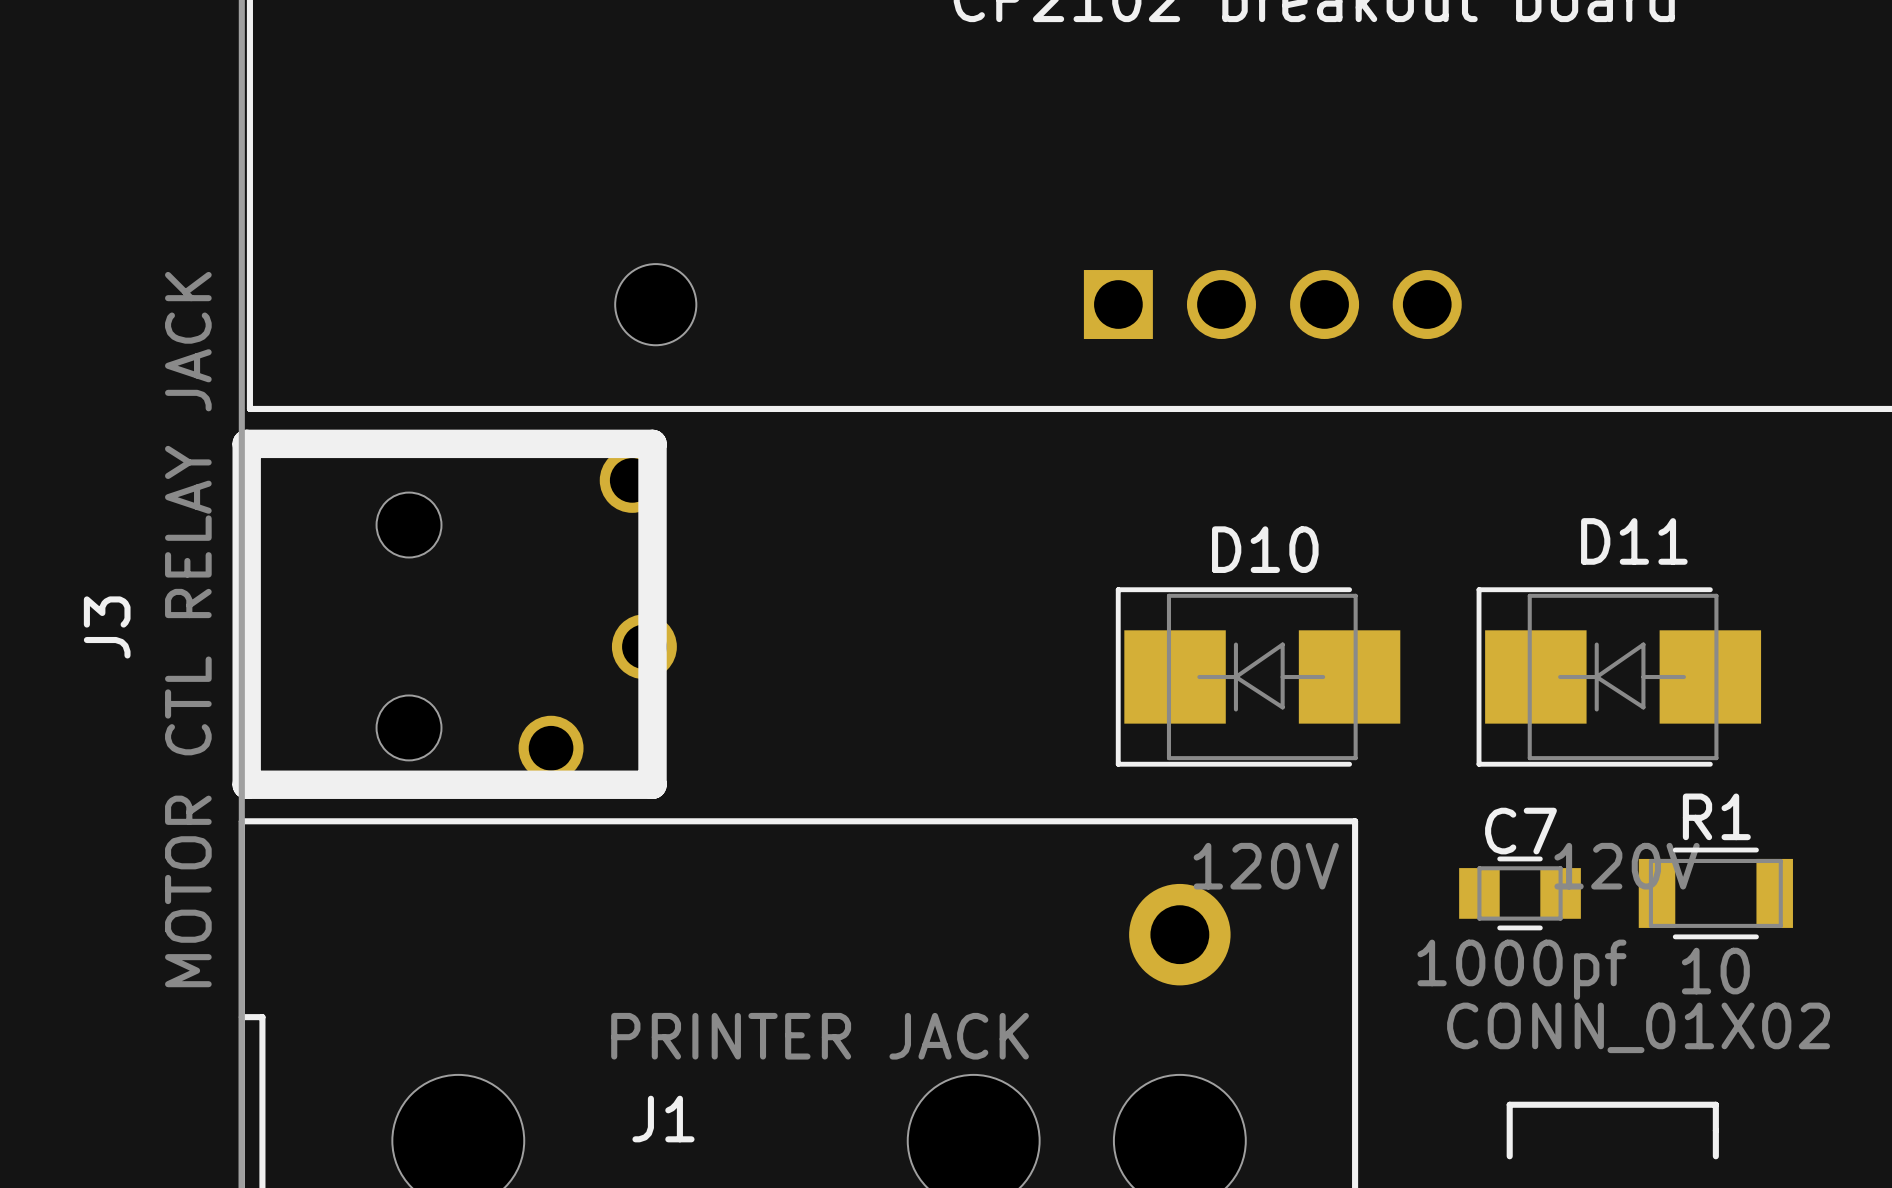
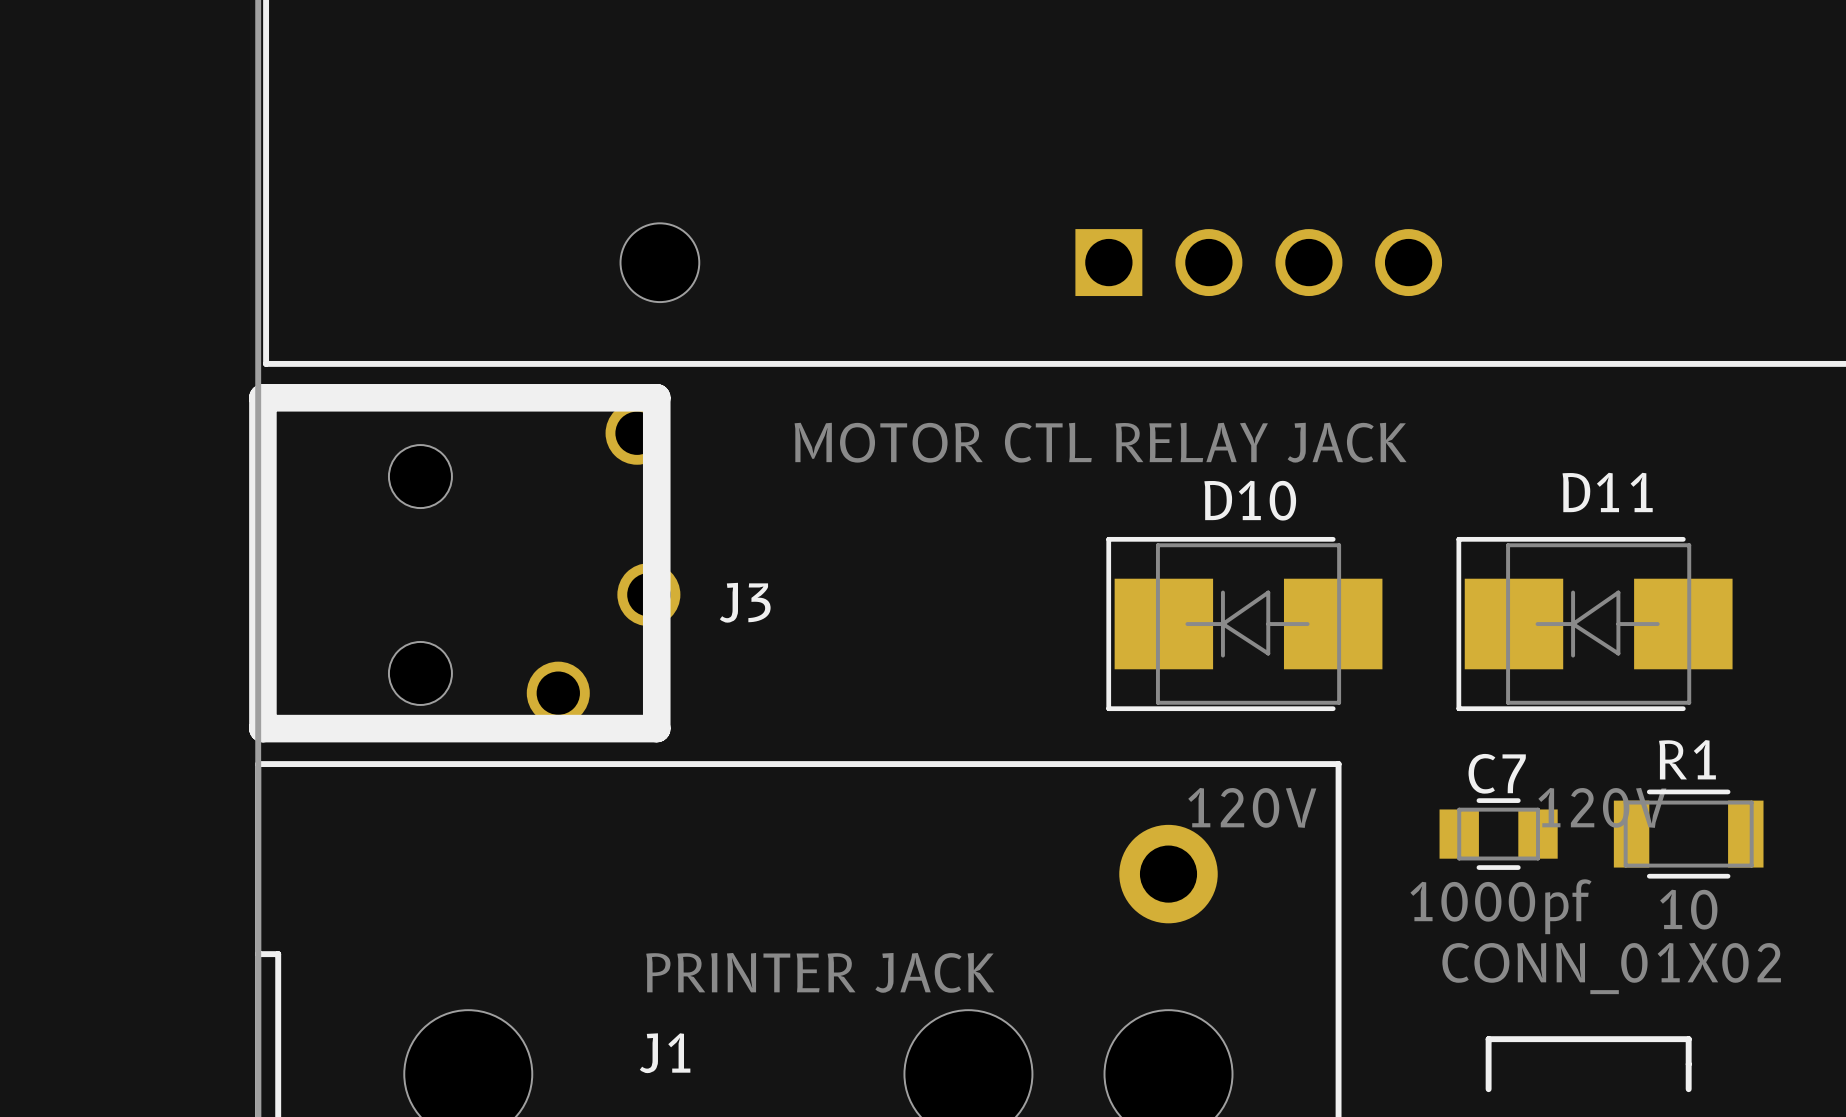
J3 name rotation: 0° (107, 627) -> 90° clockwise (745, 602)
J3 name position: J3 (107, 627) -> J3 (745, 602)
J3 value rotation: 0° (188, 629) -> 90° clockwise (1100, 442)
J3 value position: MOTOR CTL RELAY JACK (188, 629) -> MOTOR CTL RELAY JACK (1100, 442)

